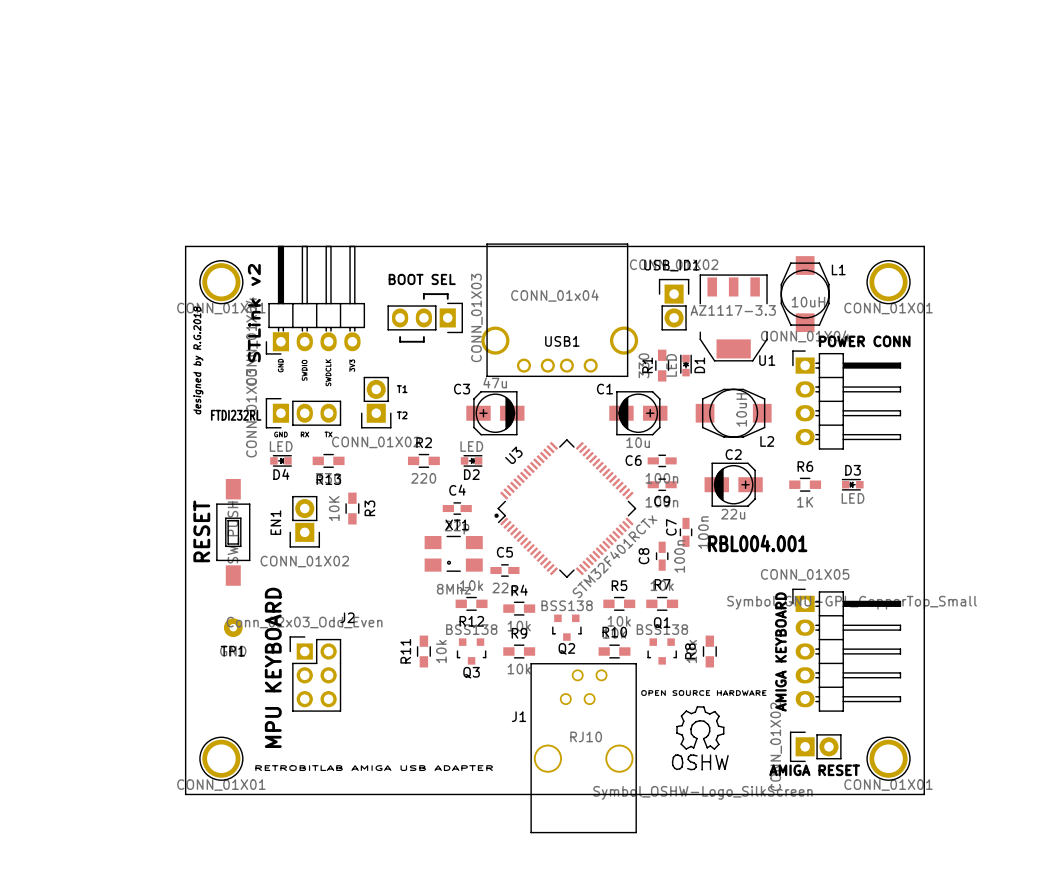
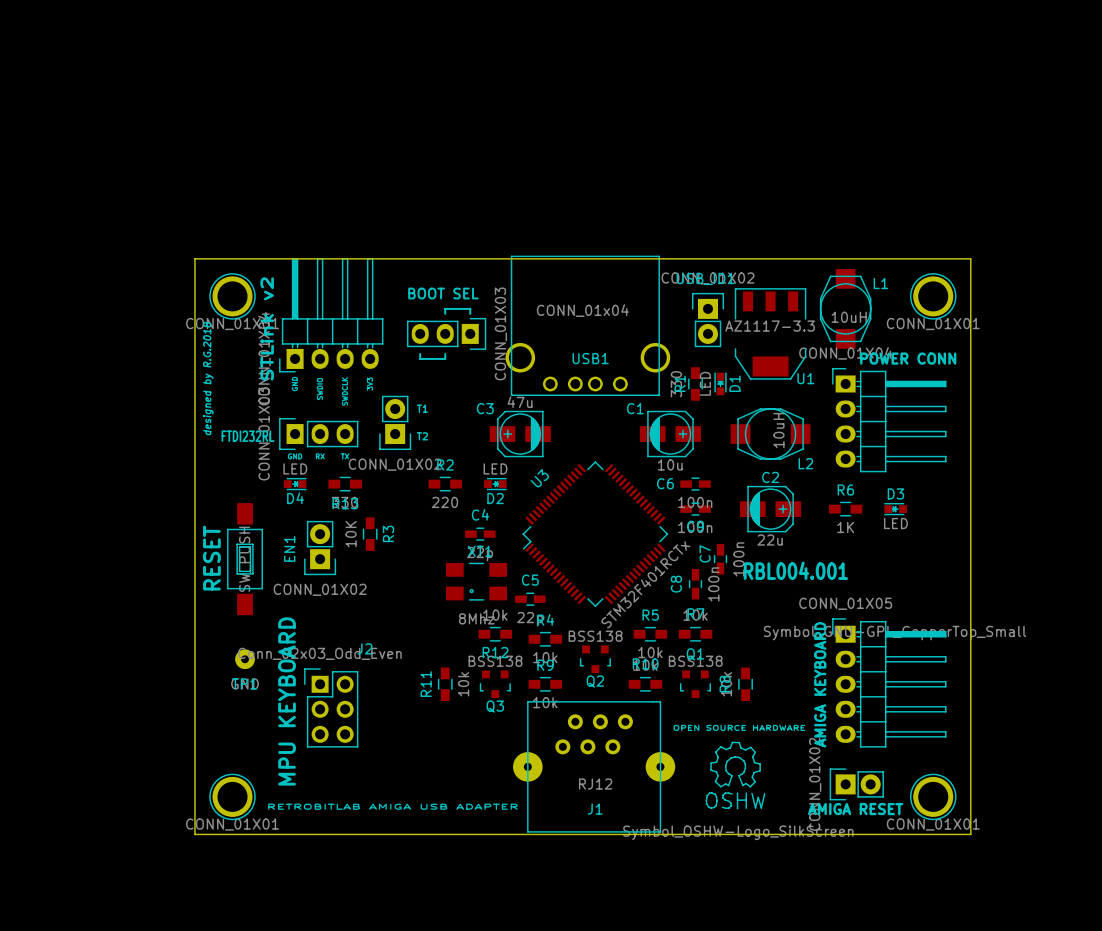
drawing: [494, 513, 499, 518] -> none
J1 footprint: [530, 663, 637, 834] -> [513, 701, 676, 833]
J1 name position: J1 (518, 716) -> J1 (595, 809)
J1 value: RJ10 (586, 736) -> RJ12 (595, 784)

